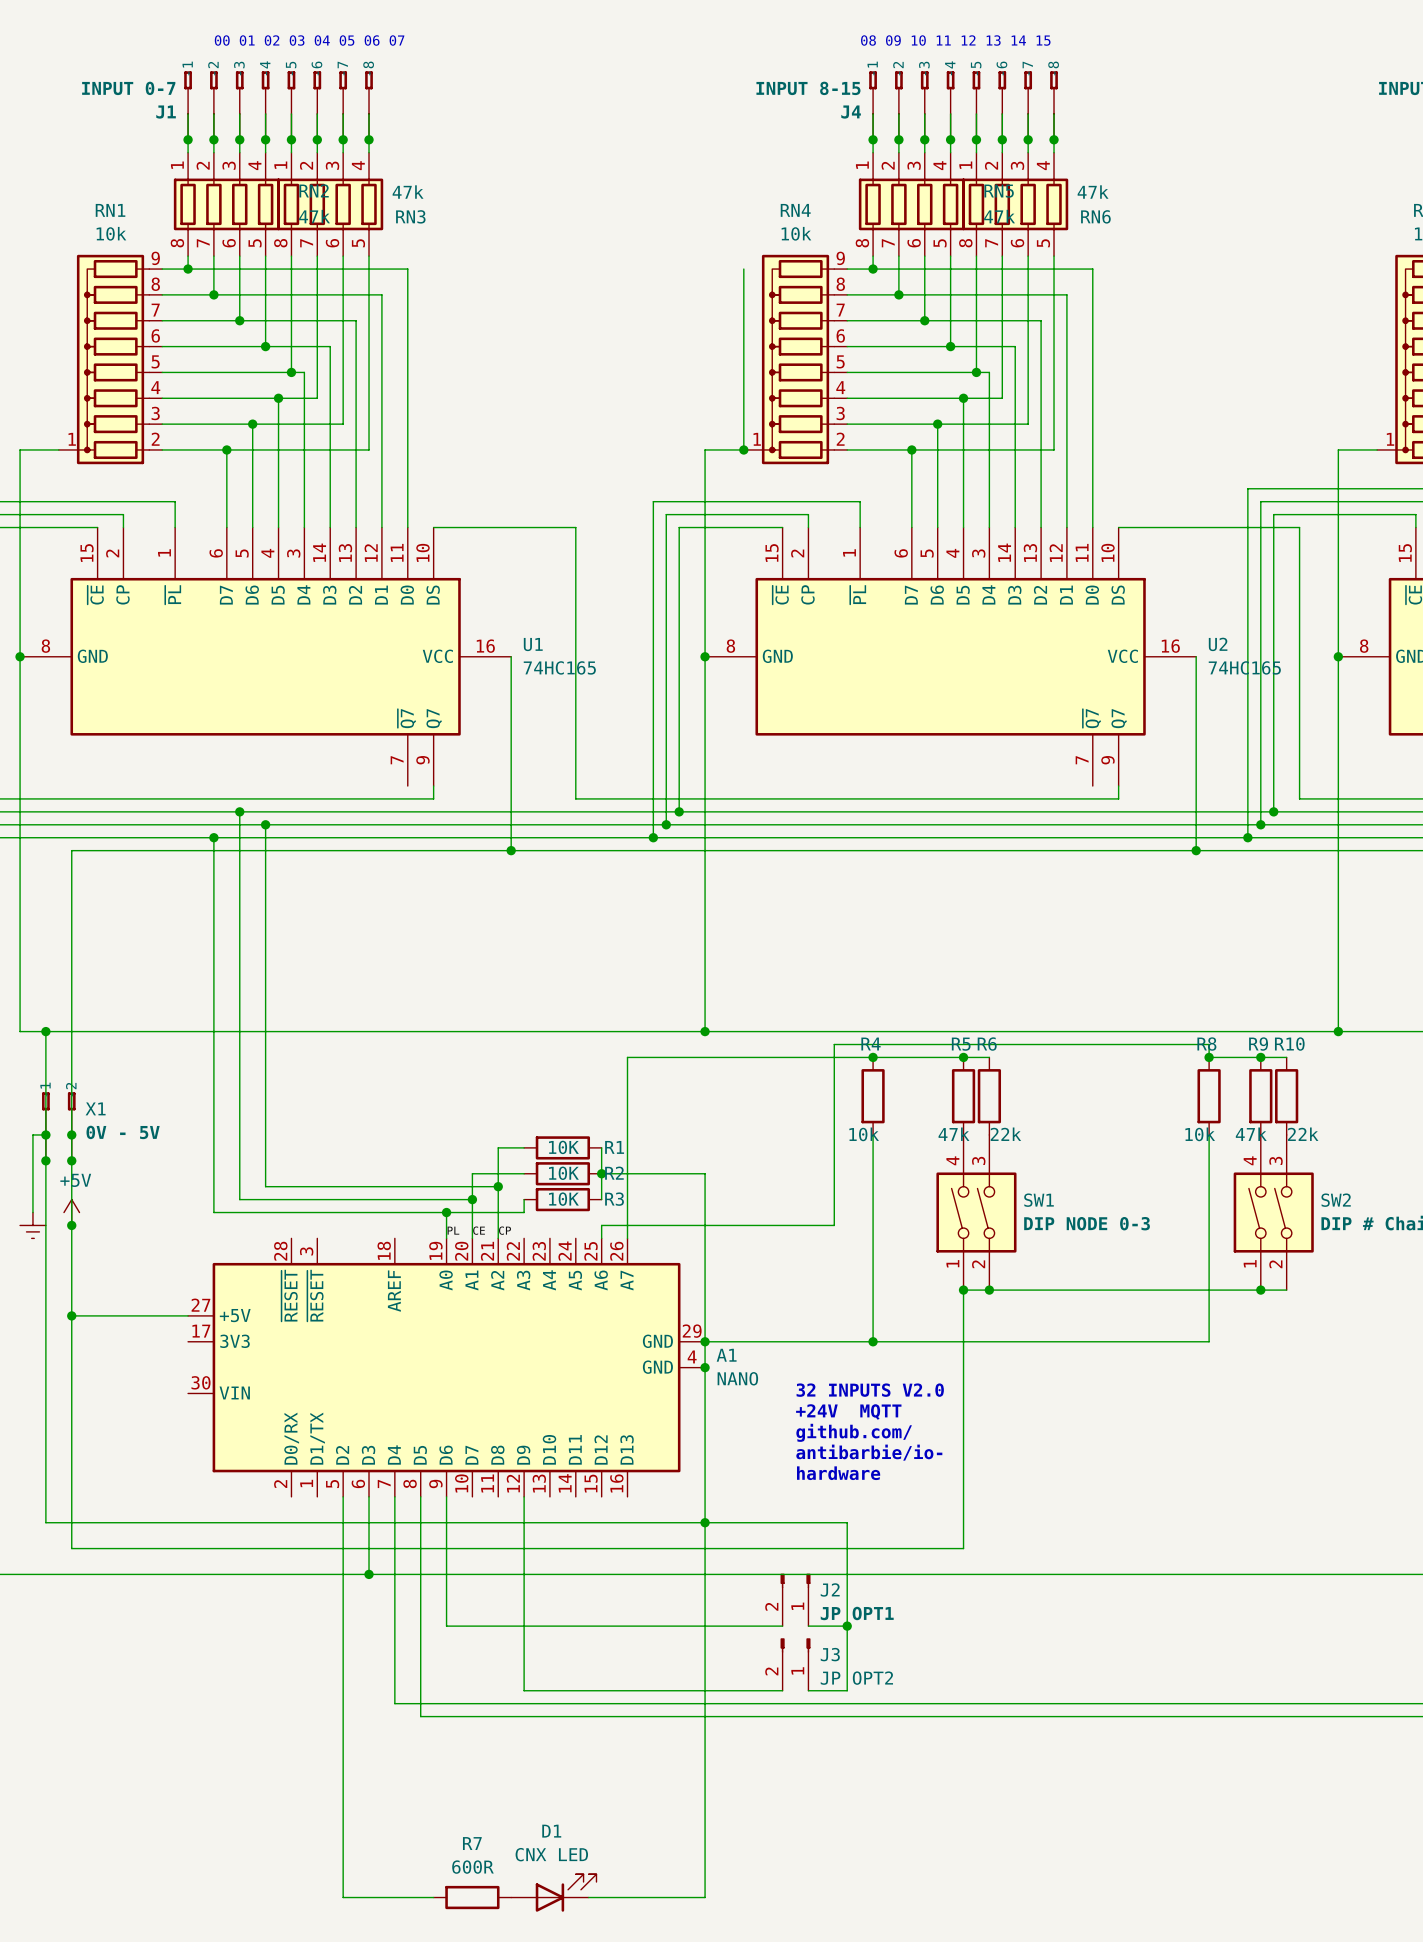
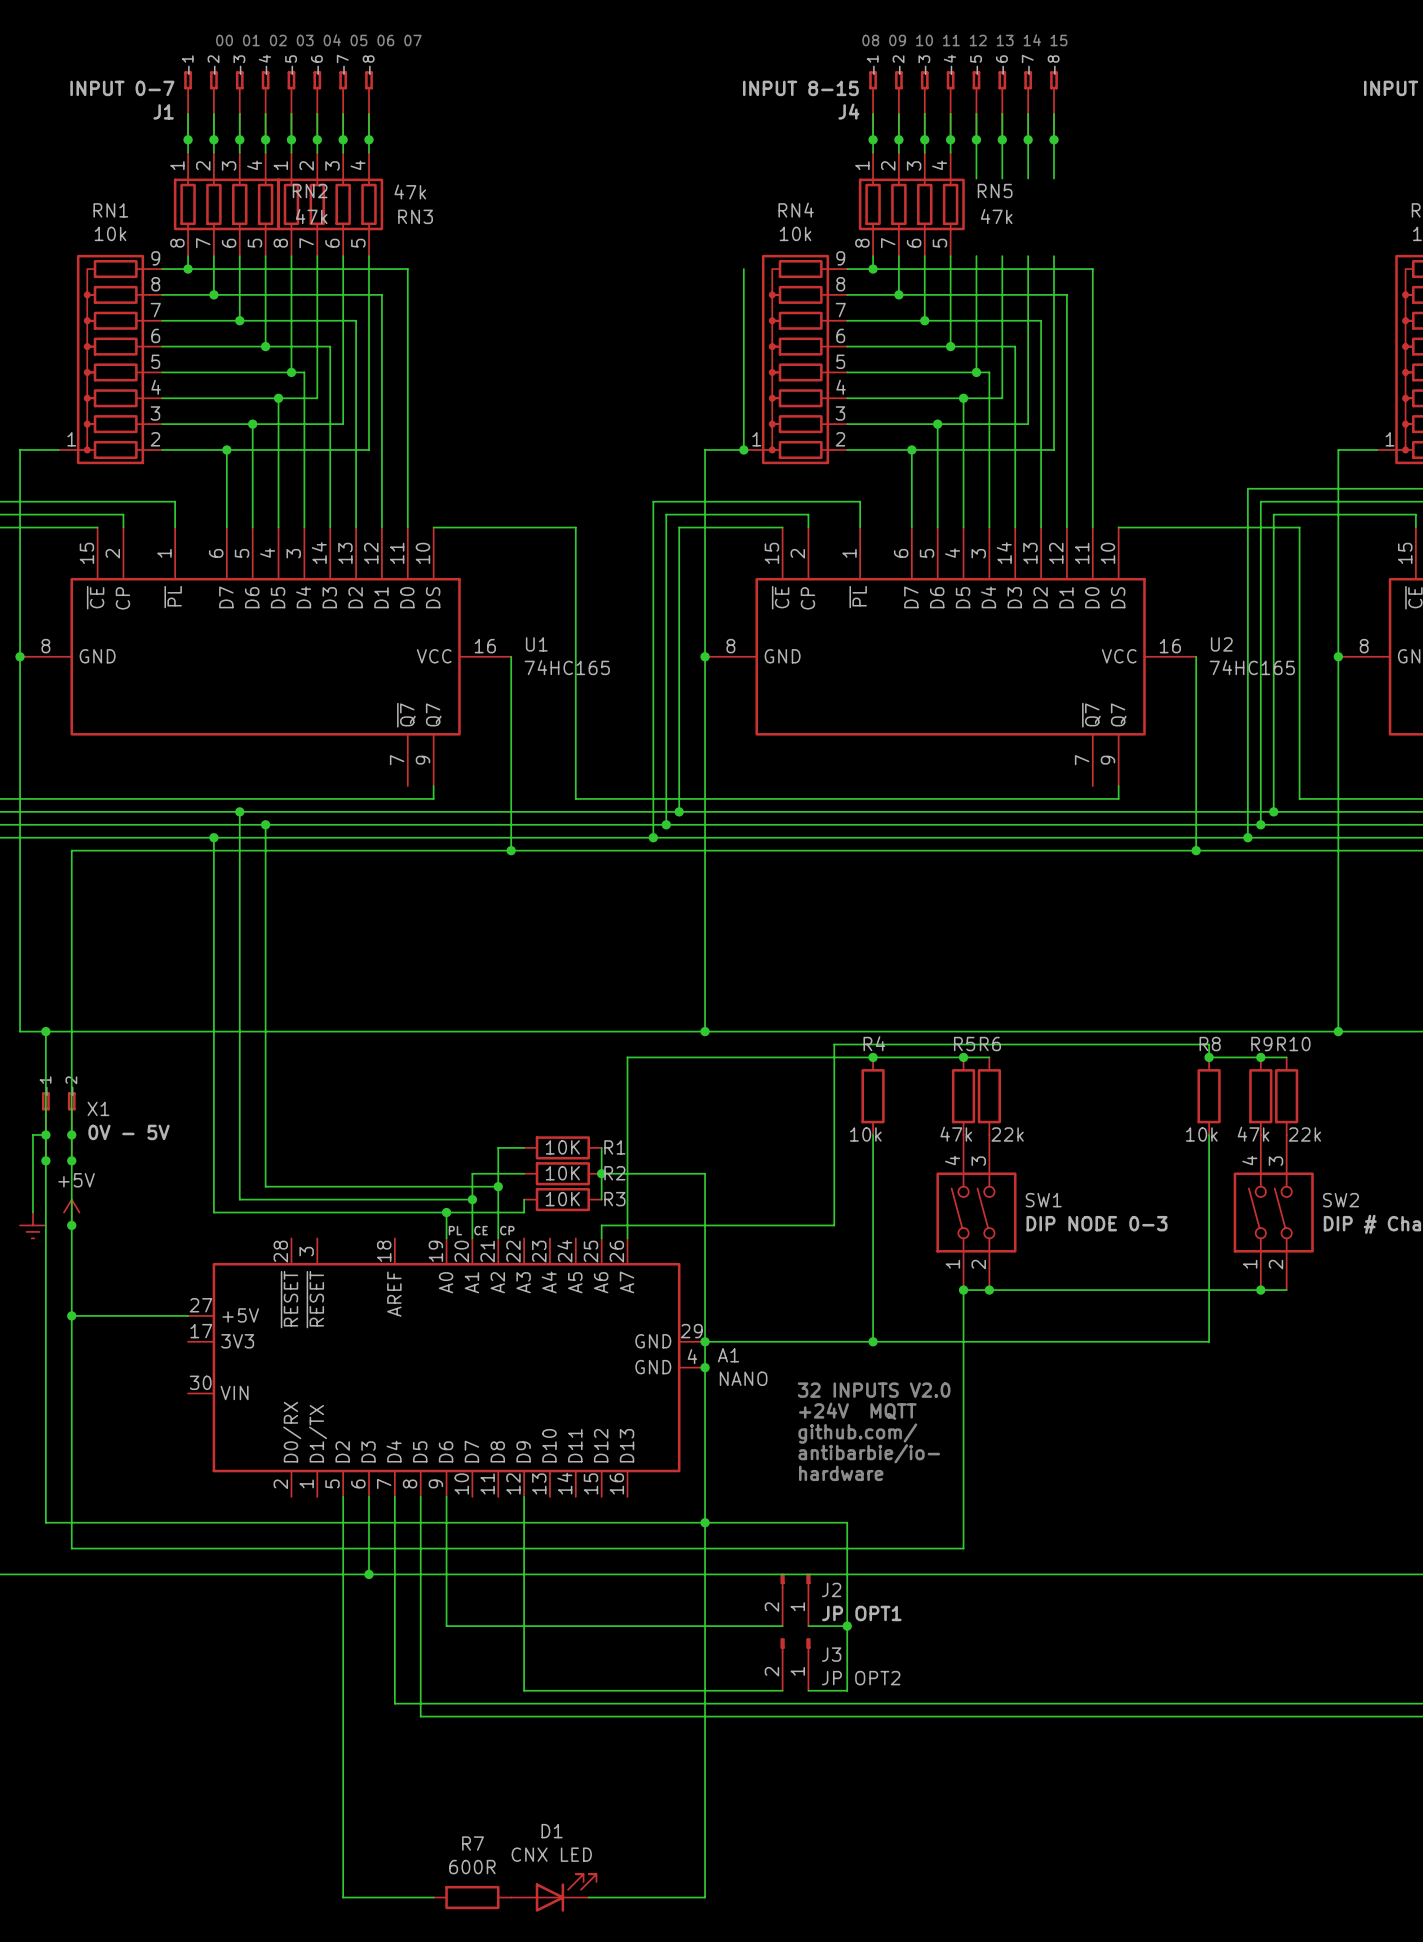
RN6: 47k (1015, 204) -> none

